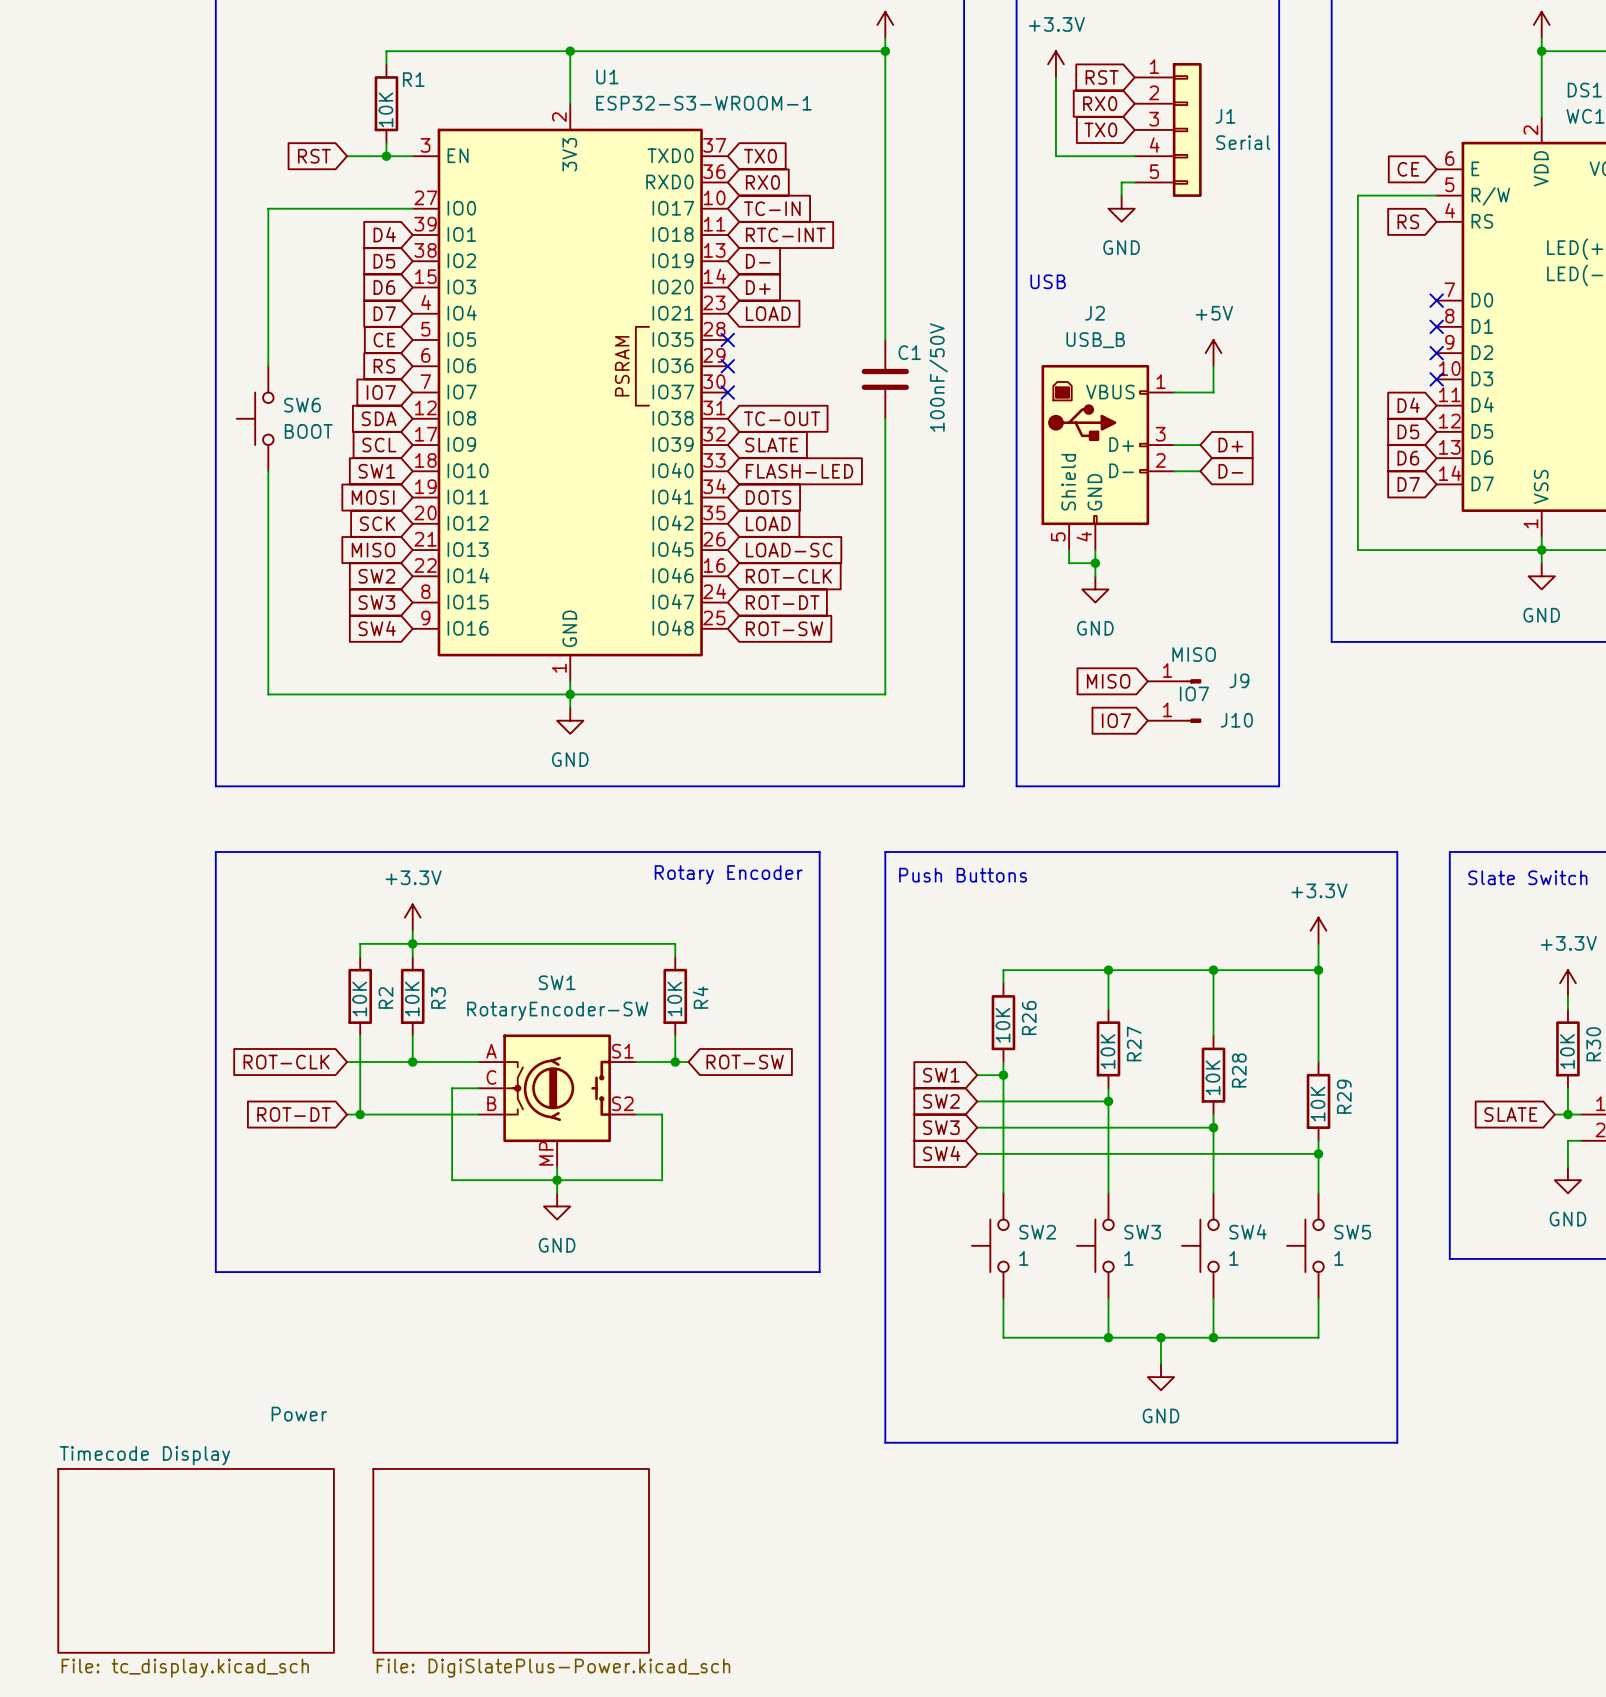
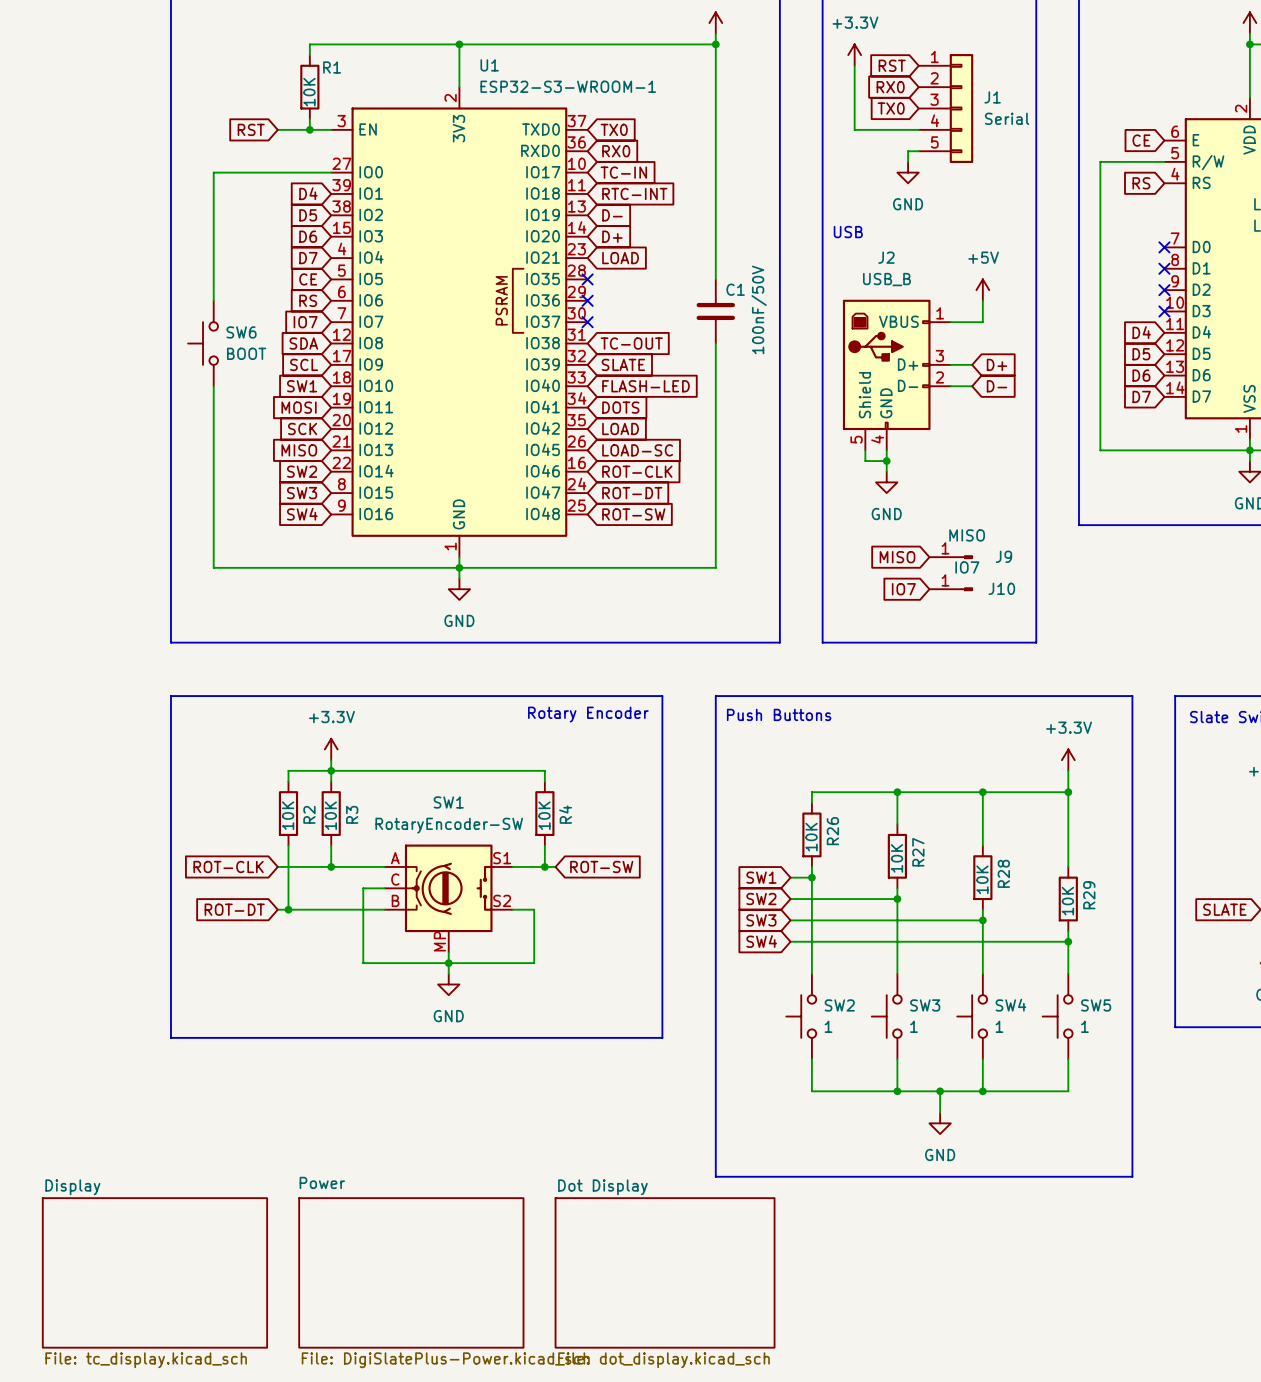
sheet Power name position: Power (299, 1414) -> Power (322, 1182)
sheet Timecode Display name: Timecode Display (144, 1455) -> Display (72, 1187)
sheet Dot Display: none -> File: dot_display.kicad_sch (665, 1272)

